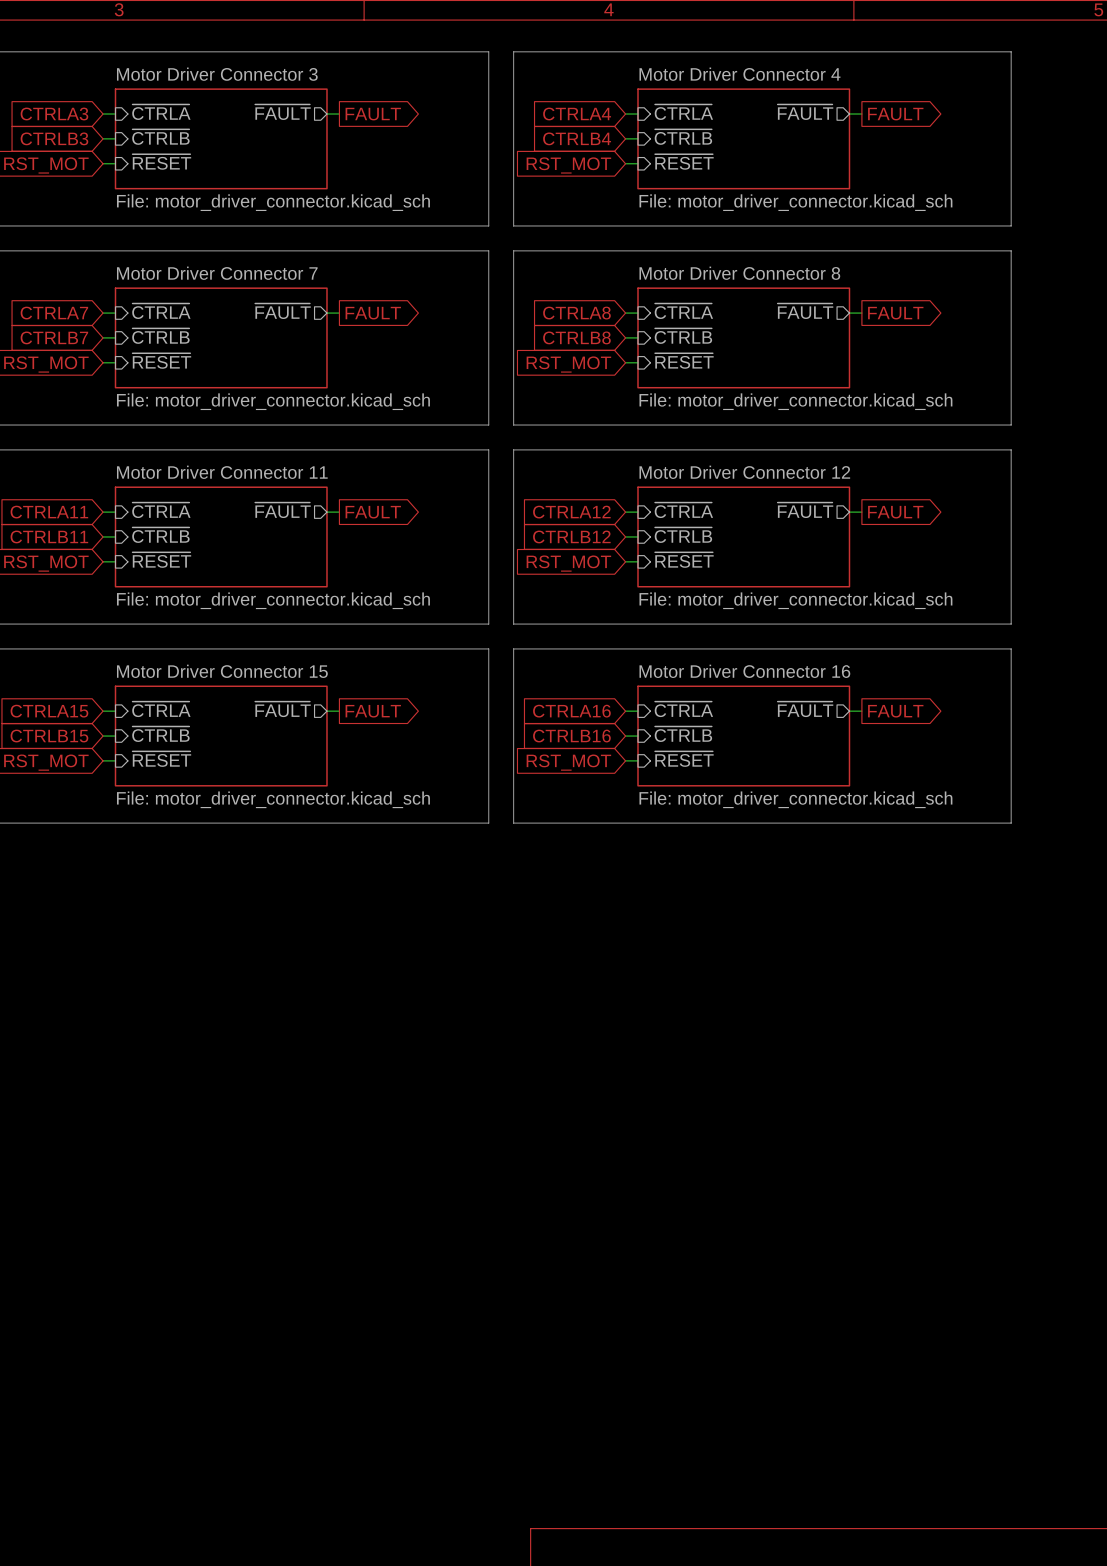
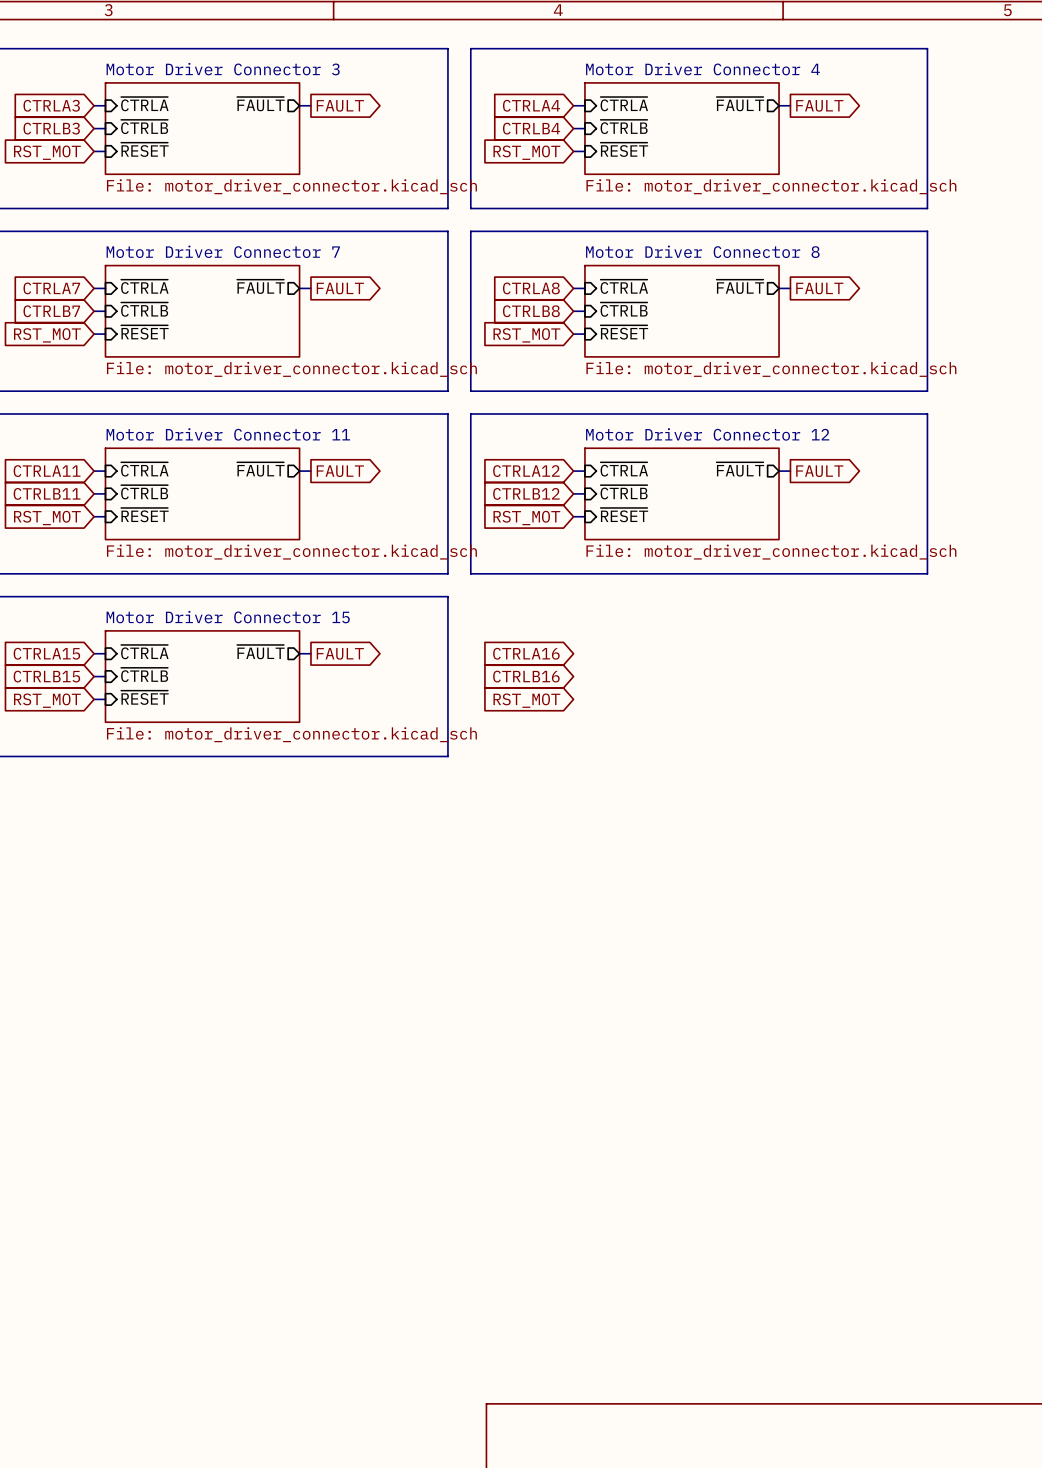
line: (513, 648) (513, 823) (1011, 823) (1011, 648) (513, 648) -> none
sheet pin: ~{CTRLA} (683, 709) -> none
sheet pin: ~{FAULT} (805, 709) -> none
wire: (625, 711) (637, 711) -> none
wire: (849, 711) (861, 711) -> none
global label: FAULT (895, 711) -> none
sheet pin: ~{CTRLB} (683, 734) -> none
wire: (625, 736) (637, 736) -> none
sheet Motor Driver Connector 16: File: motor_driver_connector.kicad_sch (743, 736) -> none
sheet pin: ~{RESET} (684, 759) -> none
wire: (625, 760) (637, 760) -> none

